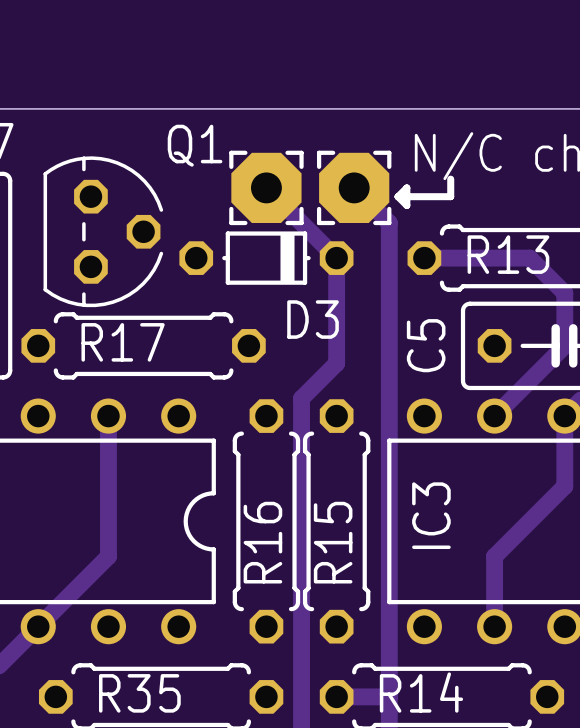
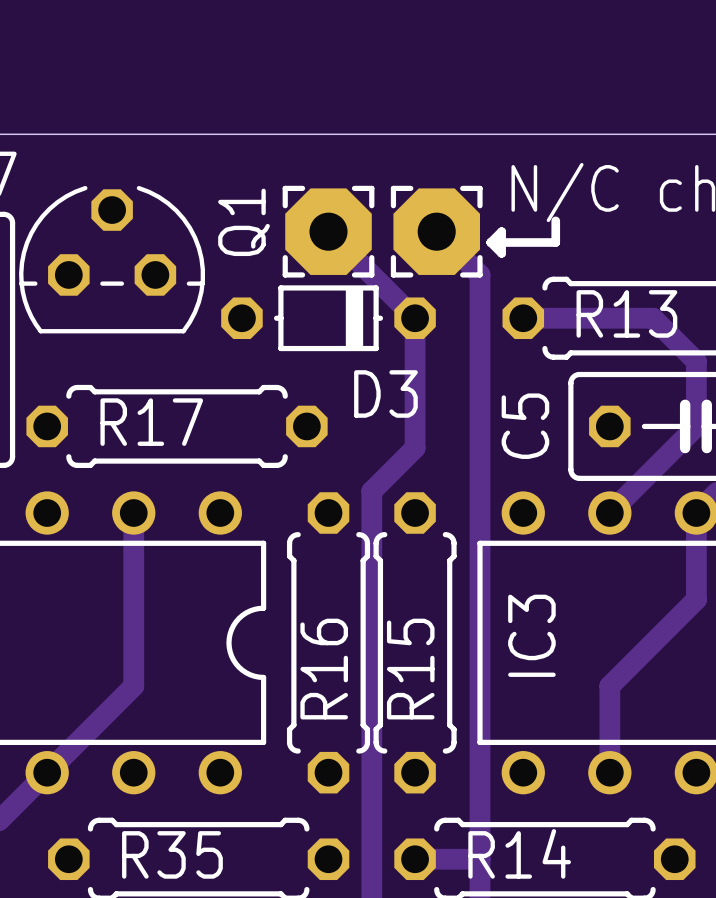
Q1 rotation: 0° (103, 231) -> 90° counterclockwise (112, 259)

